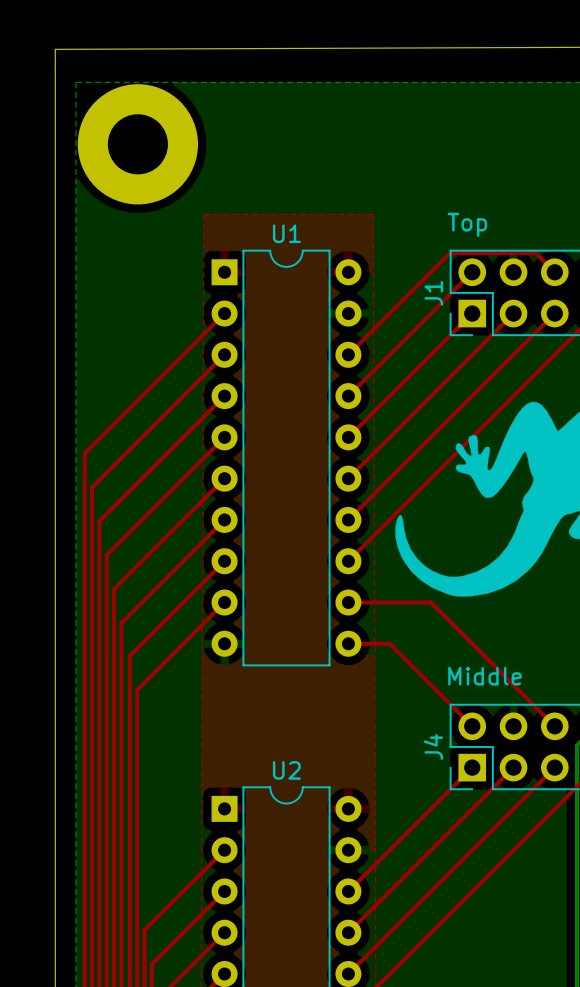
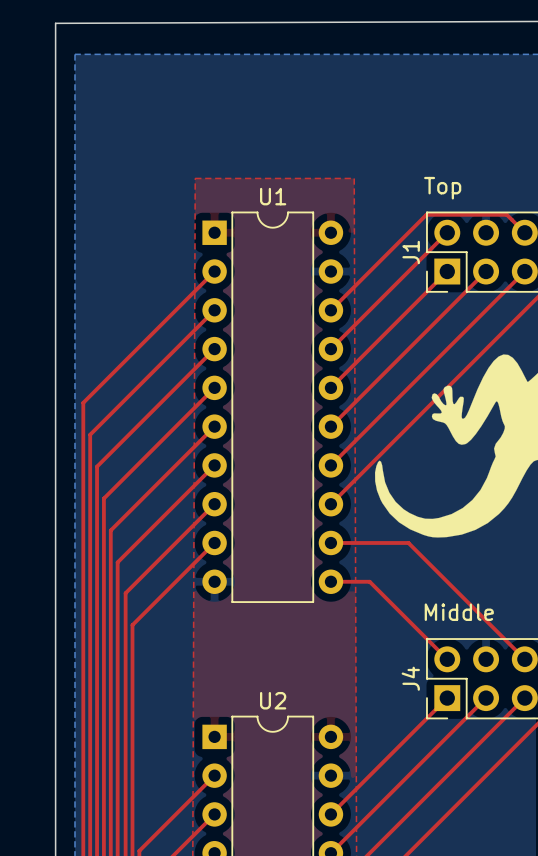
part: (137, 144) -> none

